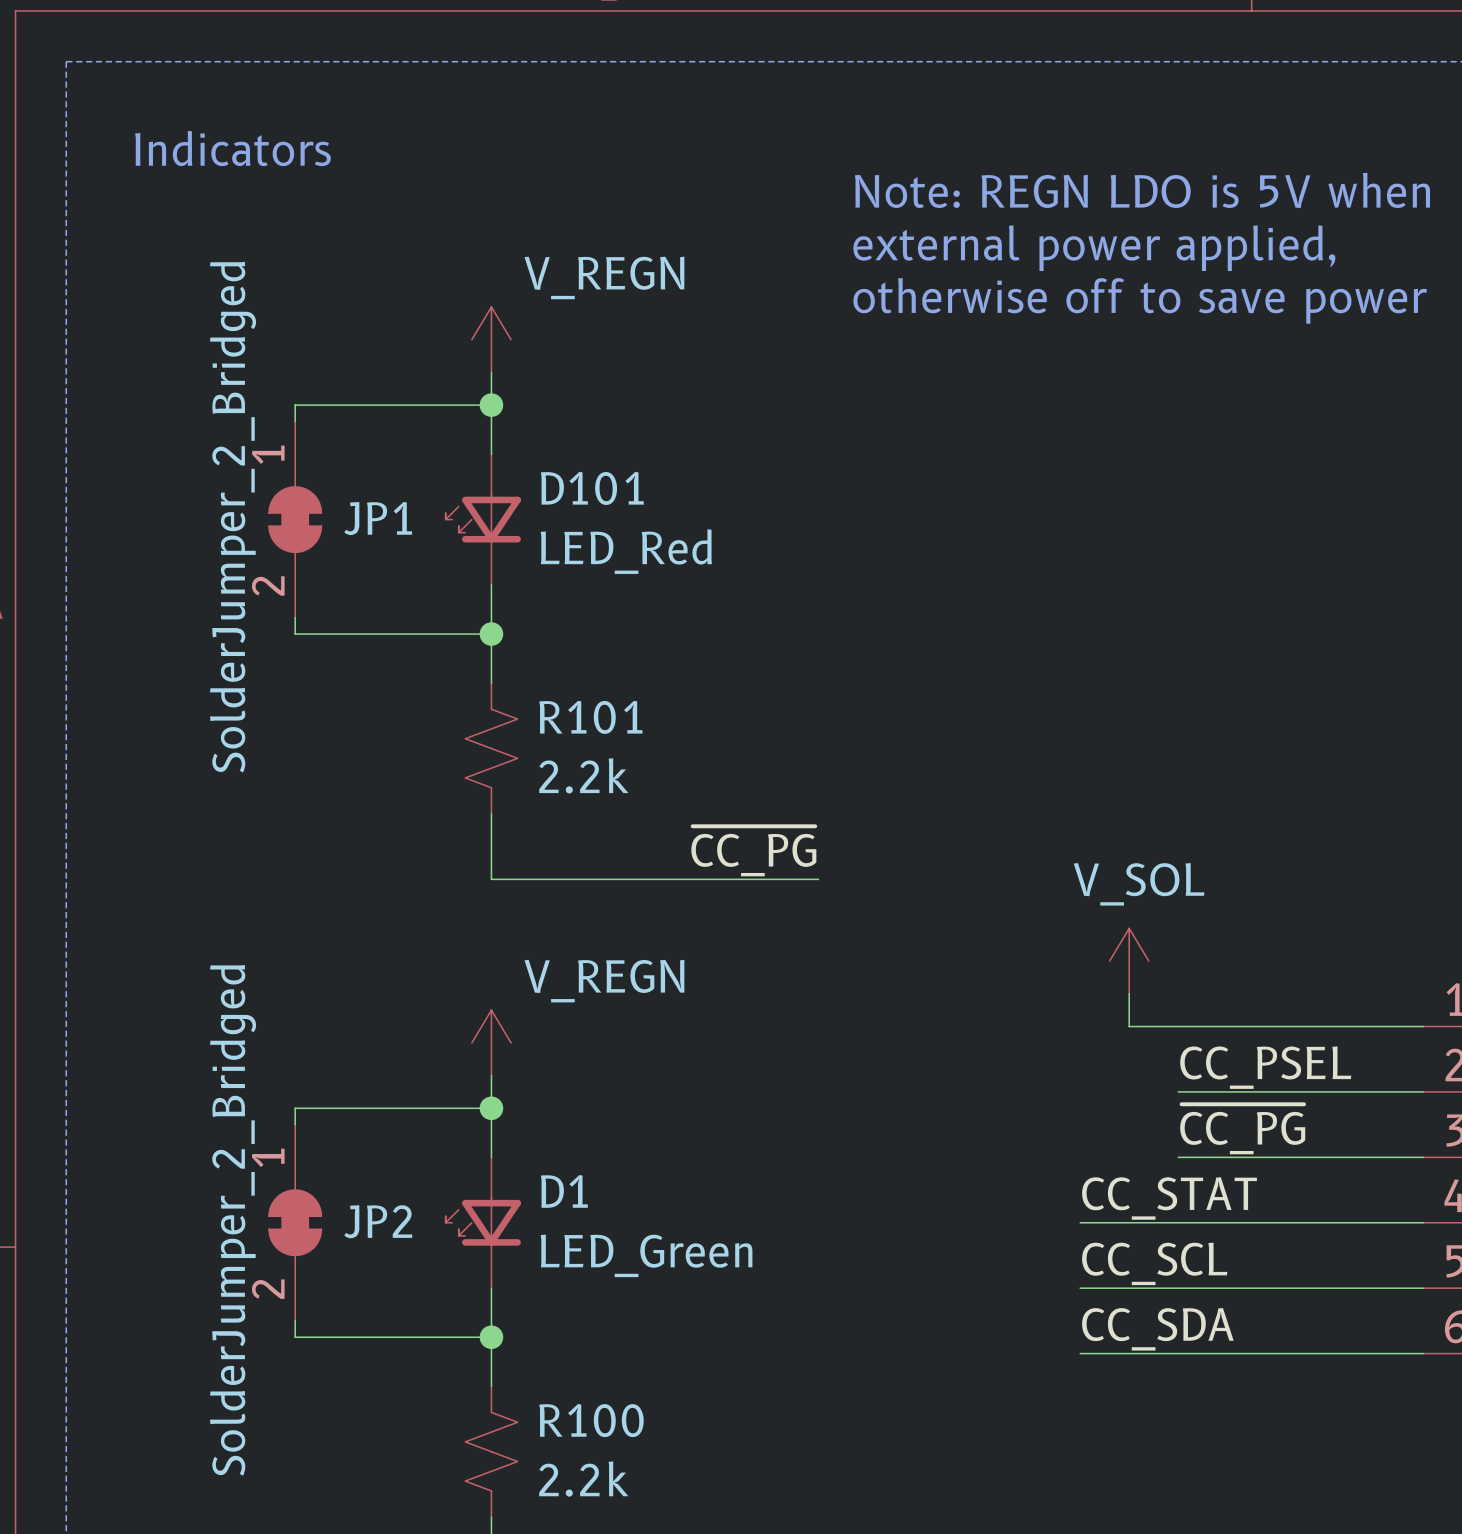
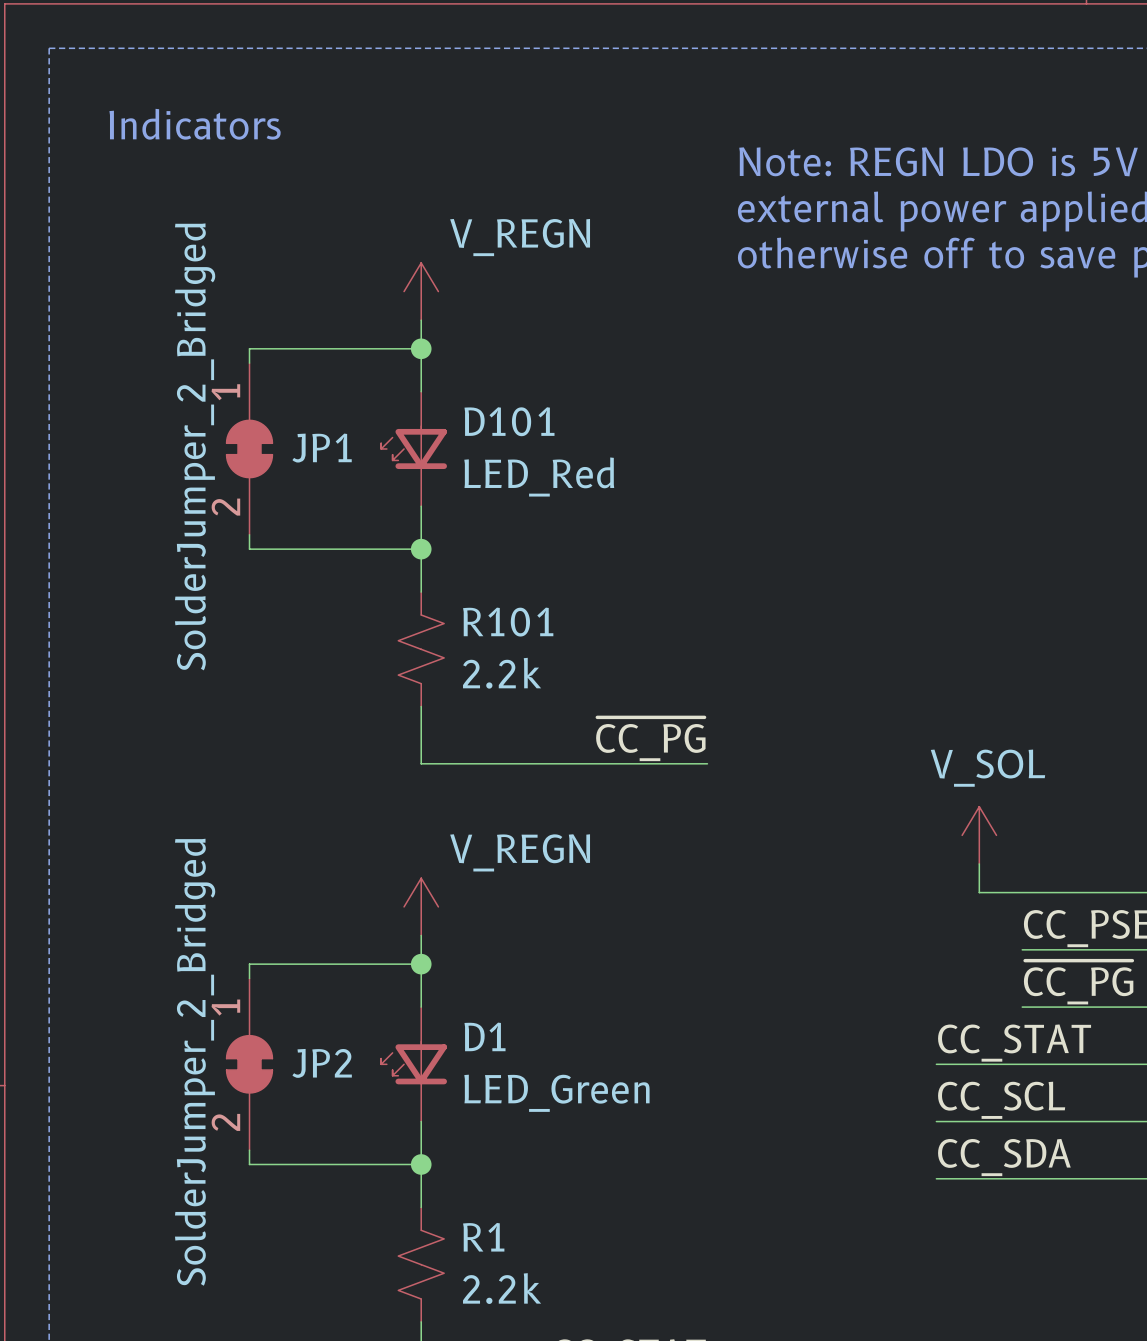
R100 name: R100 (591, 1420) -> R1 (483, 1237)

